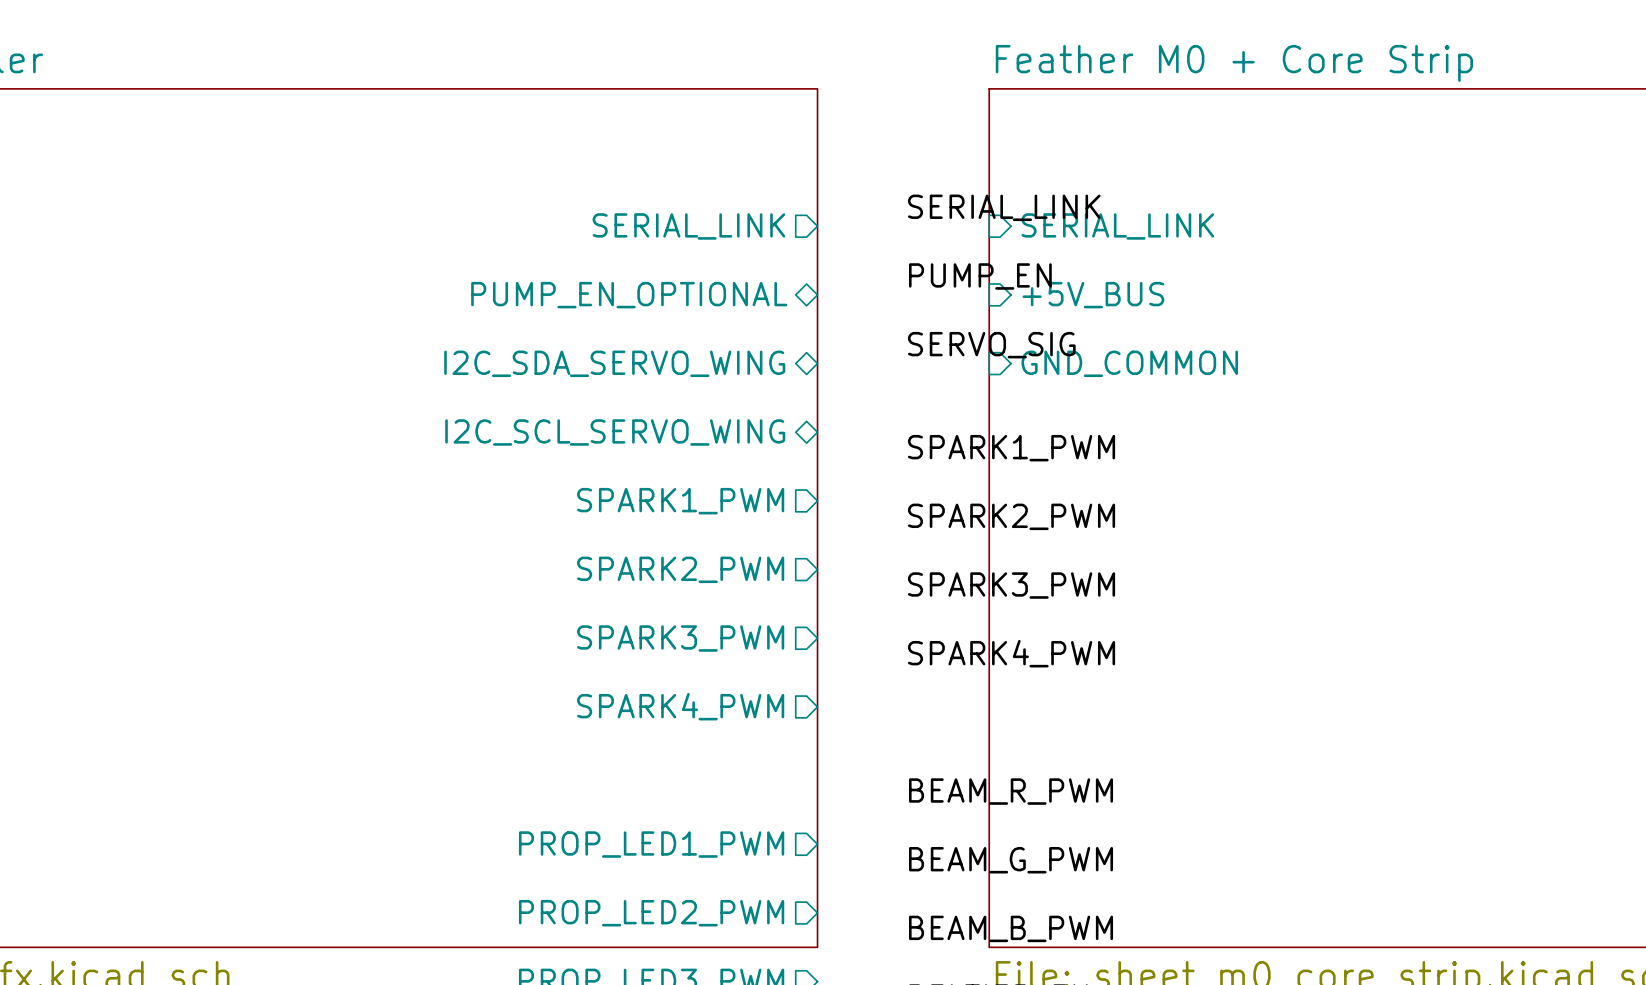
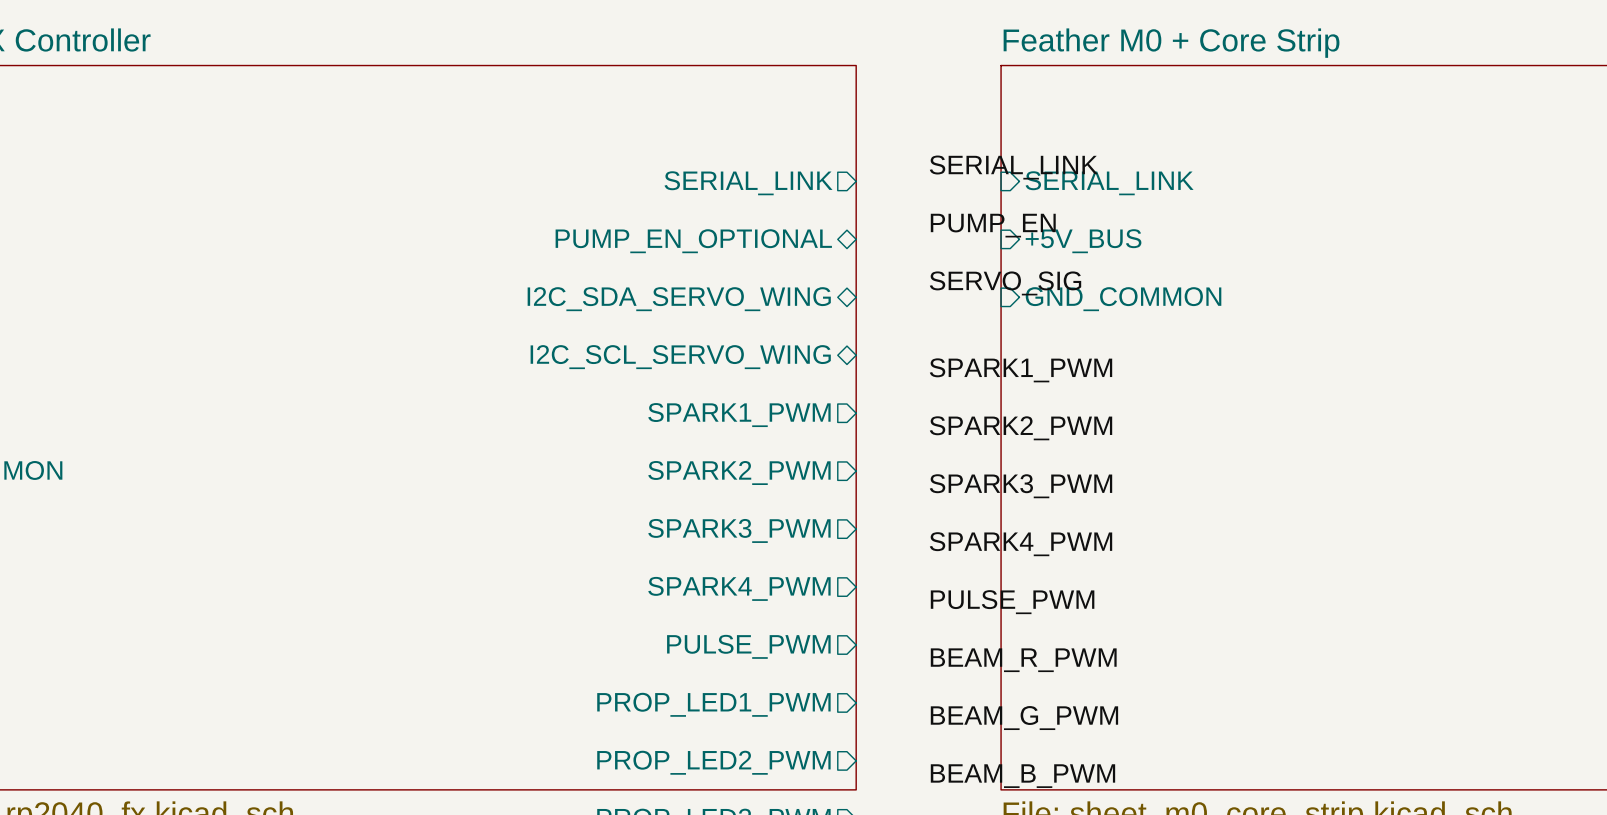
label: none -> PULSE_PWM (1012, 602)
sheet pin: none -> PULSE_PWM (748, 646)

